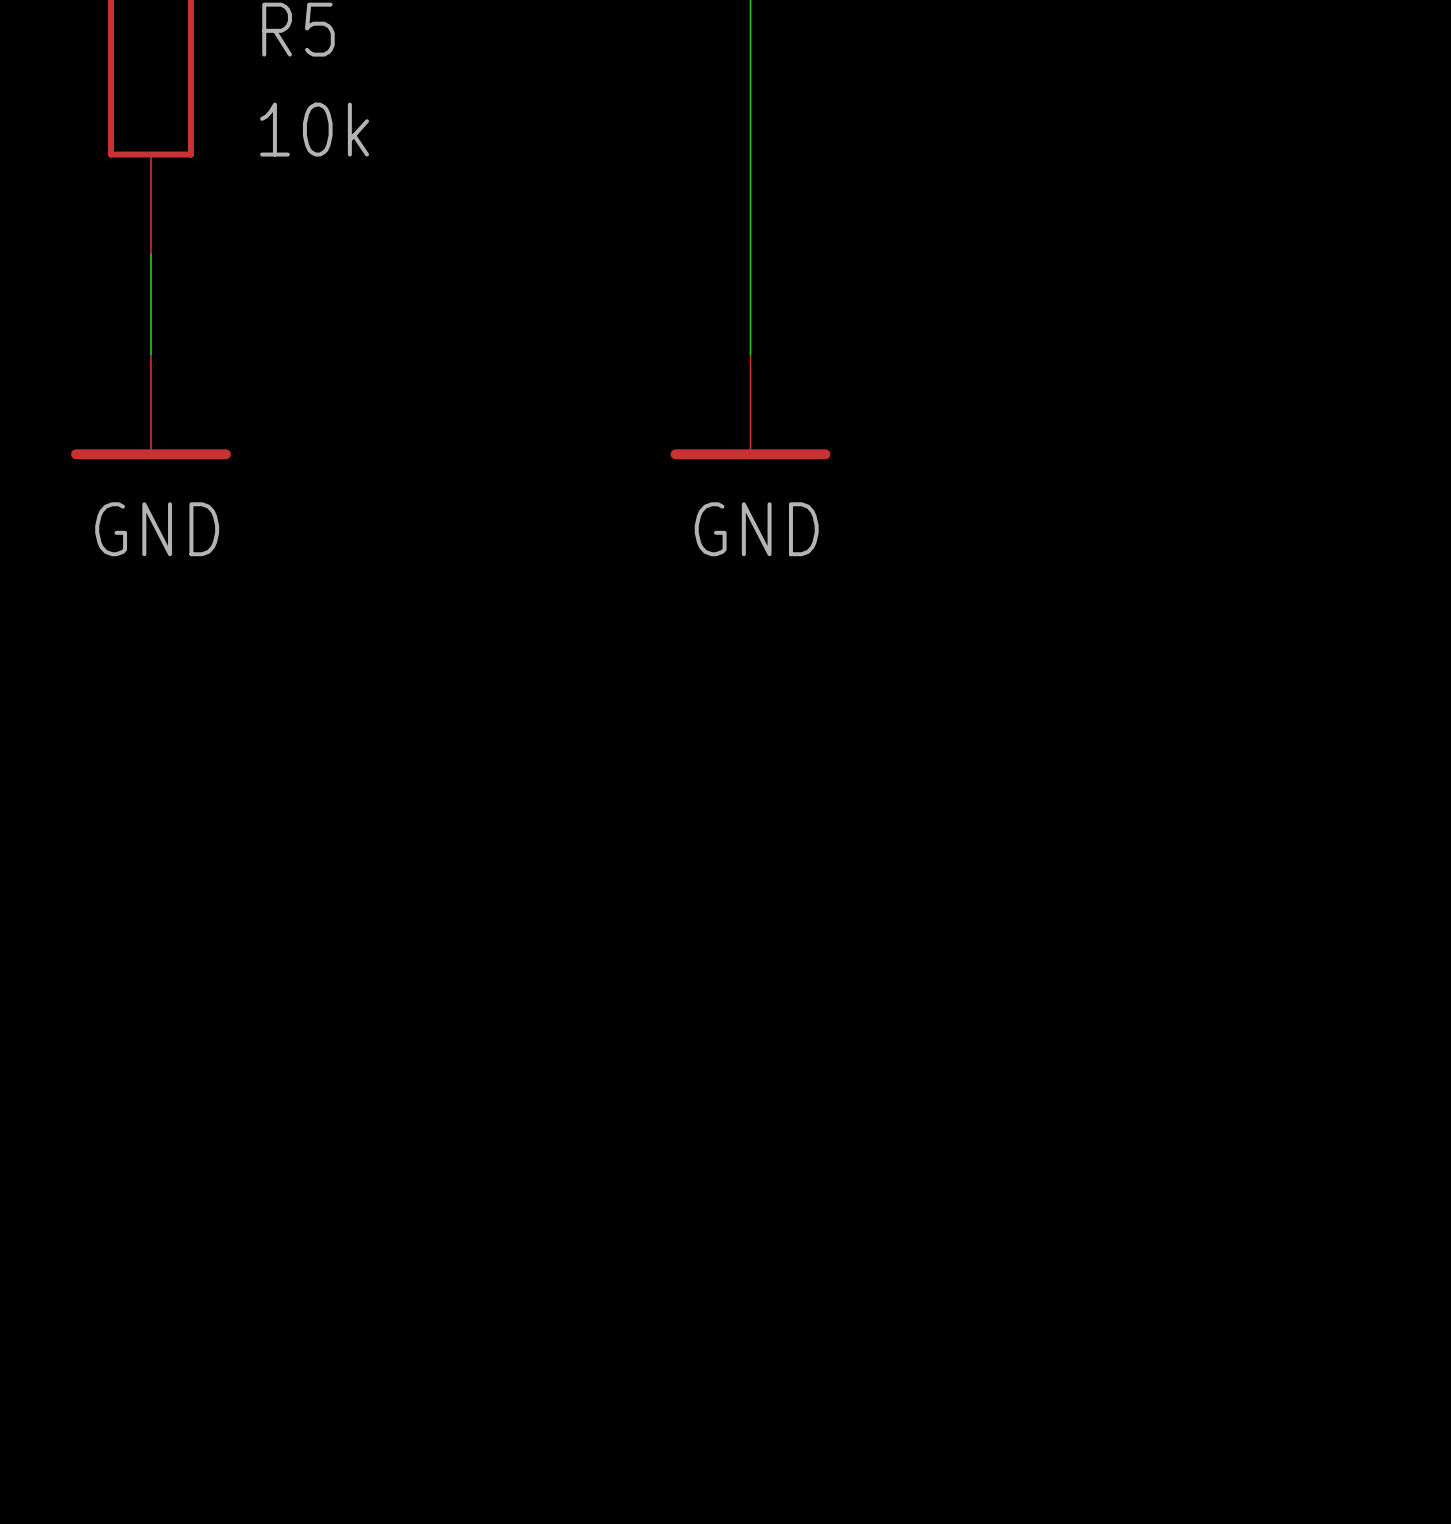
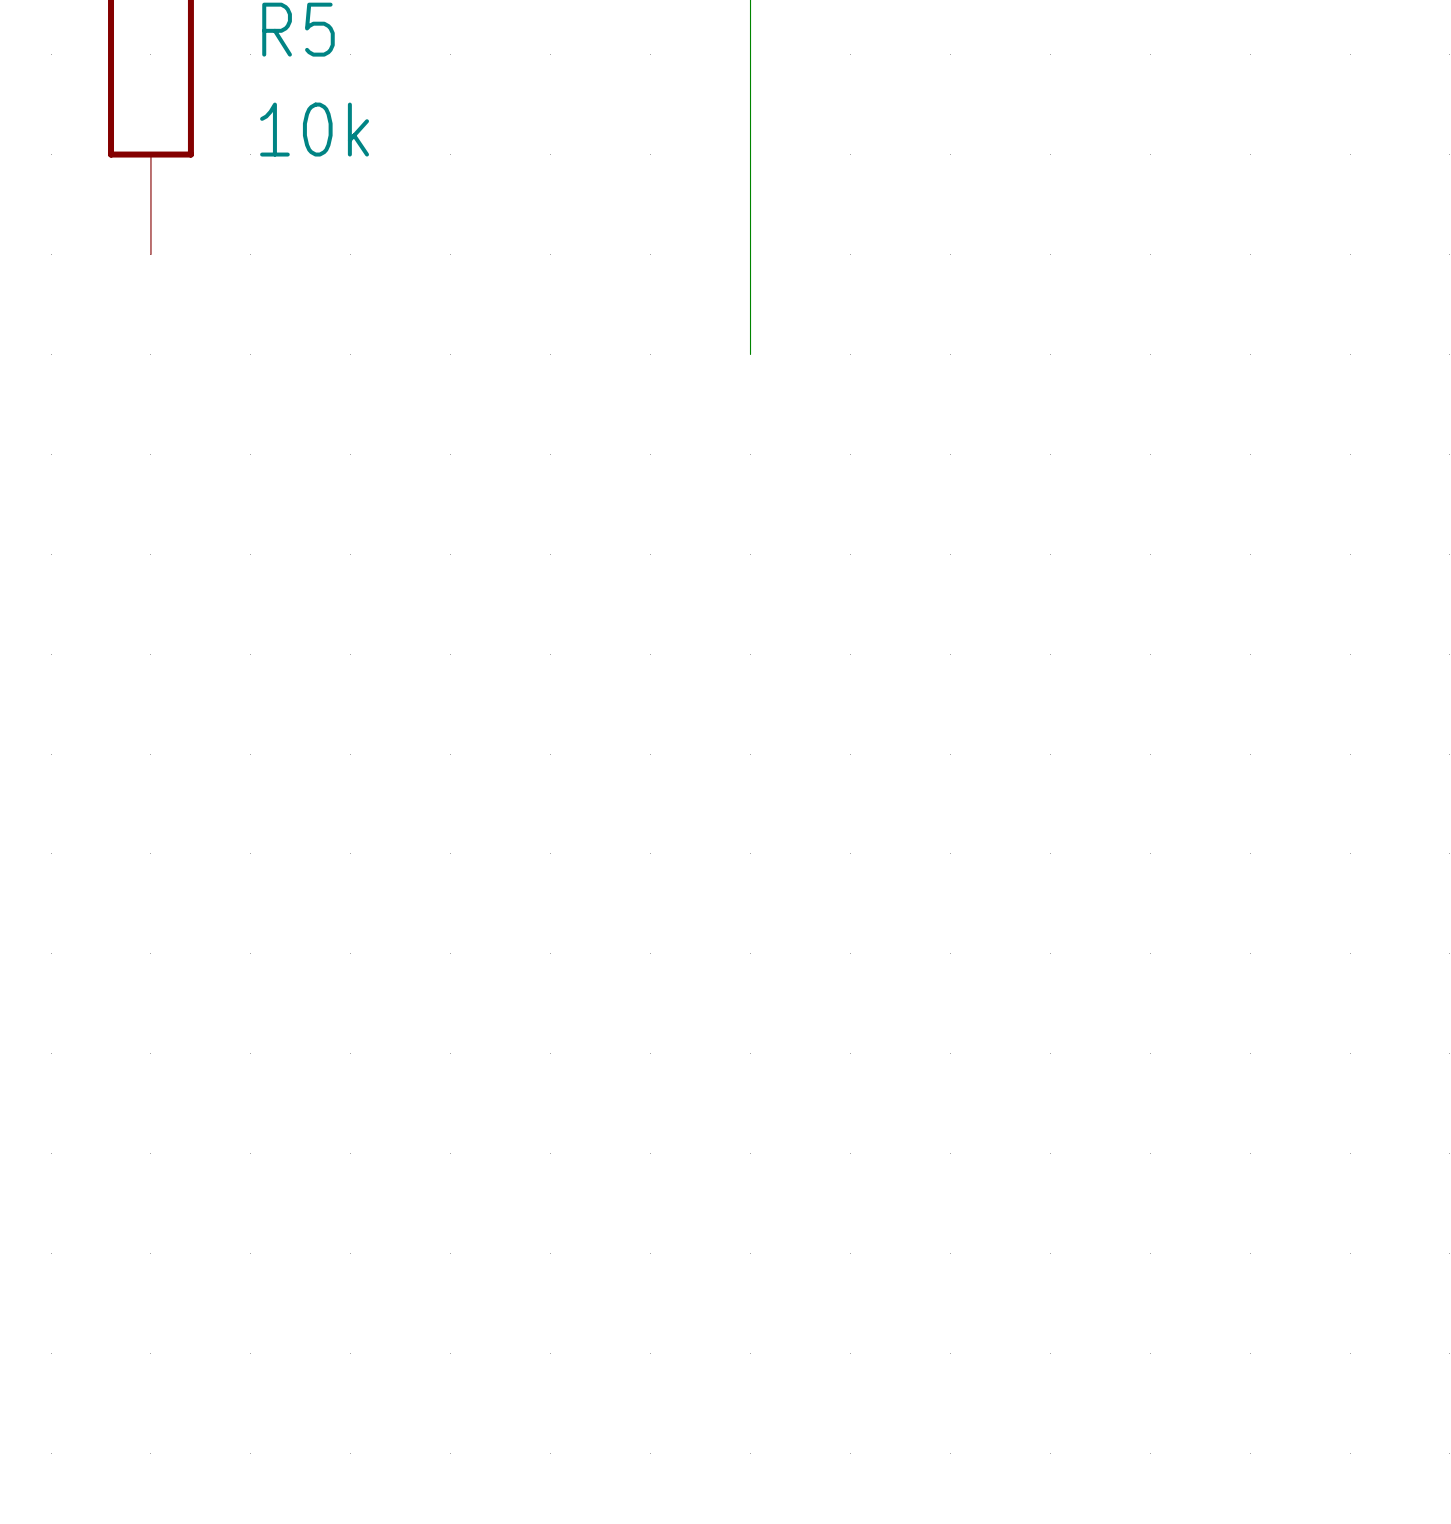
wire: (150, 254) (150, 354) -> none
power symbol: GND (150, 406) -> none
power symbol: GND (750, 406) -> none

